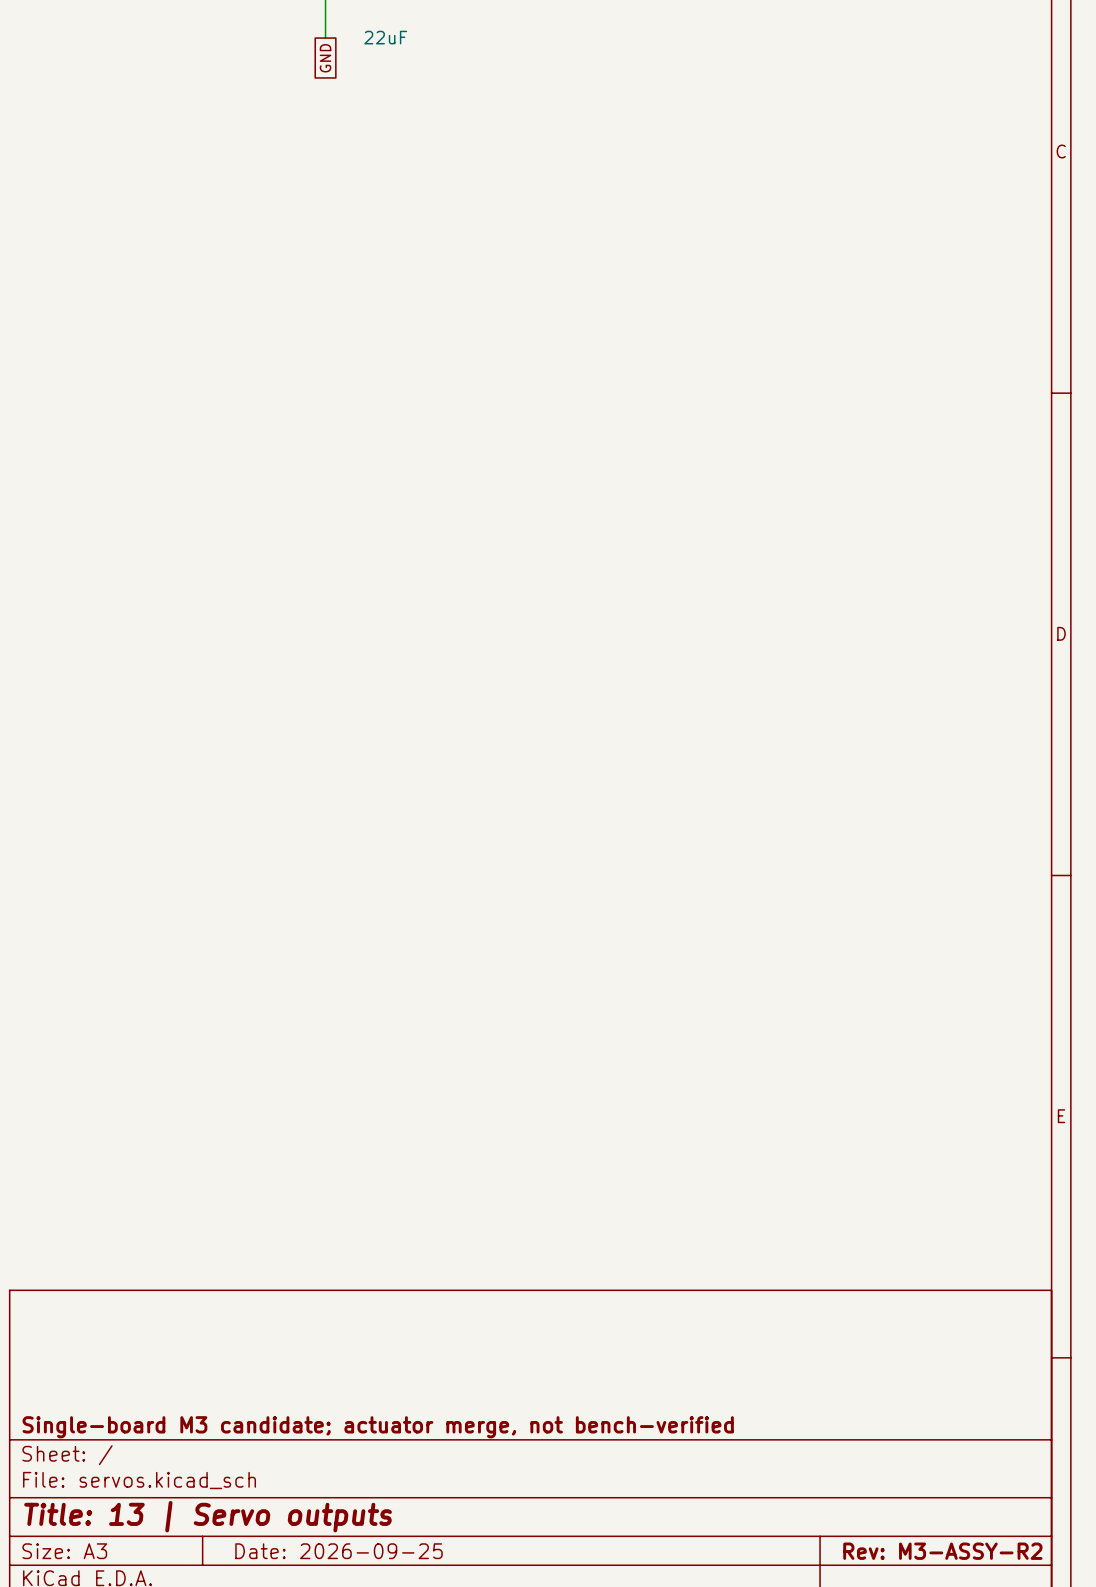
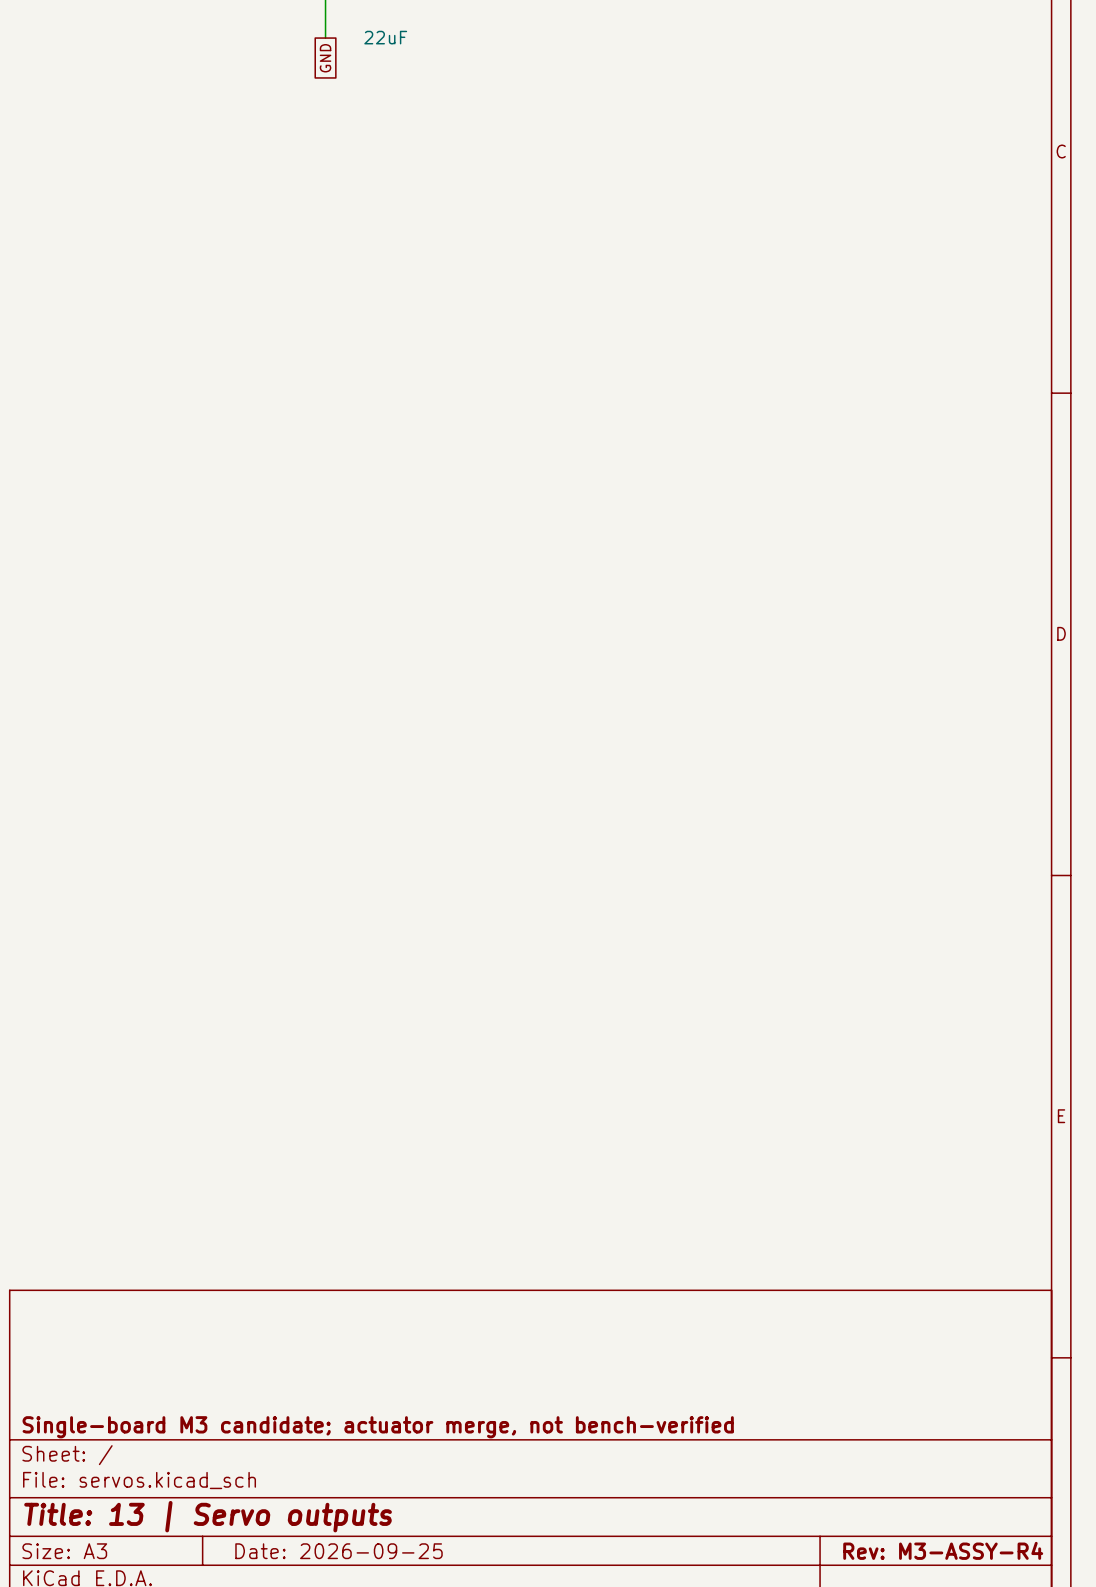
title block: Rev: M3-ASSY-R2 (942, 1551) -> Rev: M3-ASSY-R4 (943, 1550)

